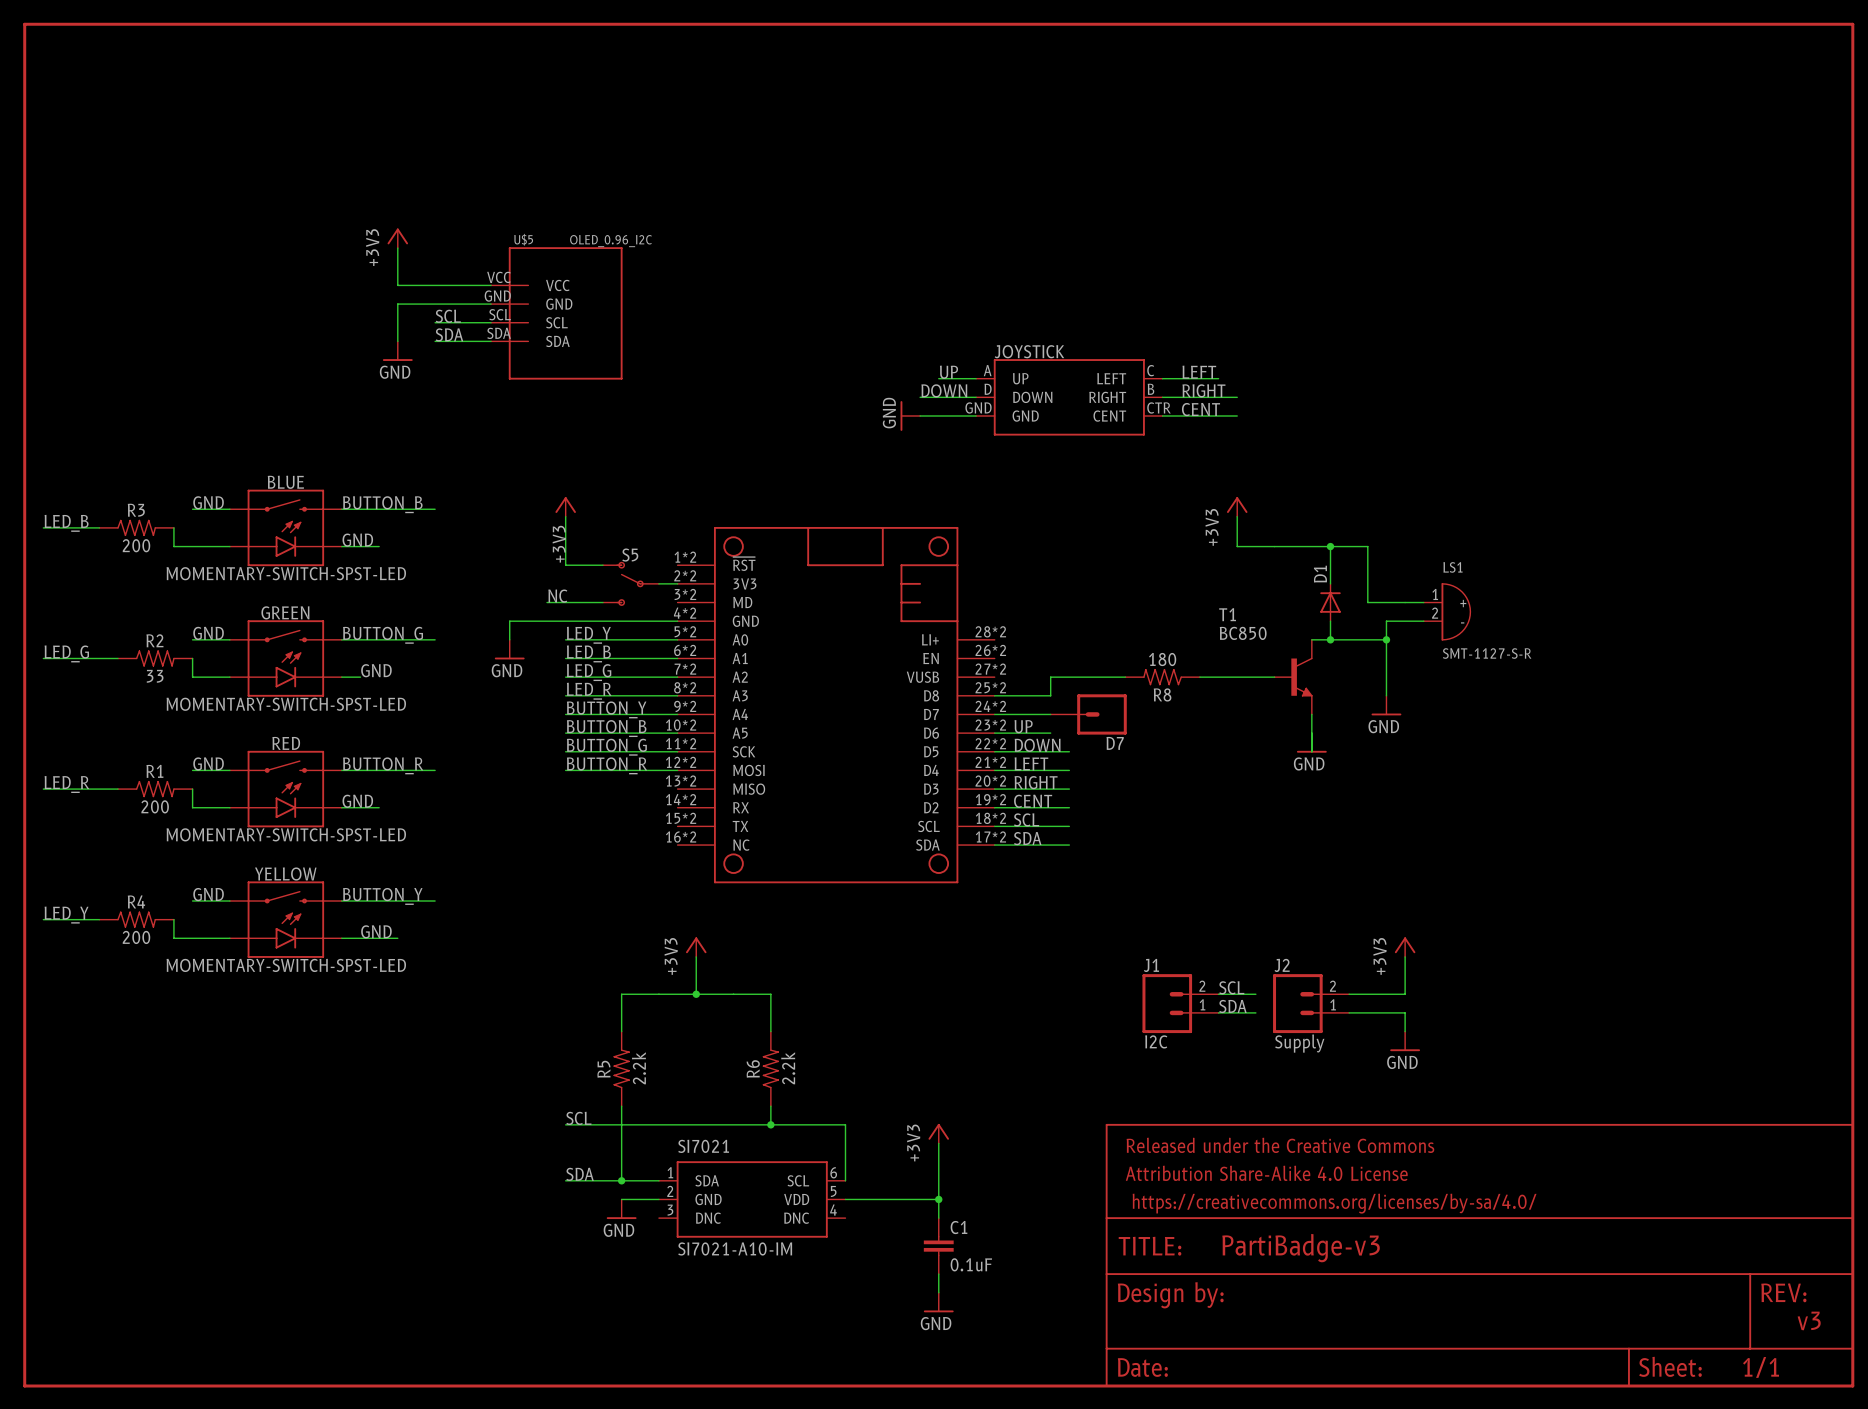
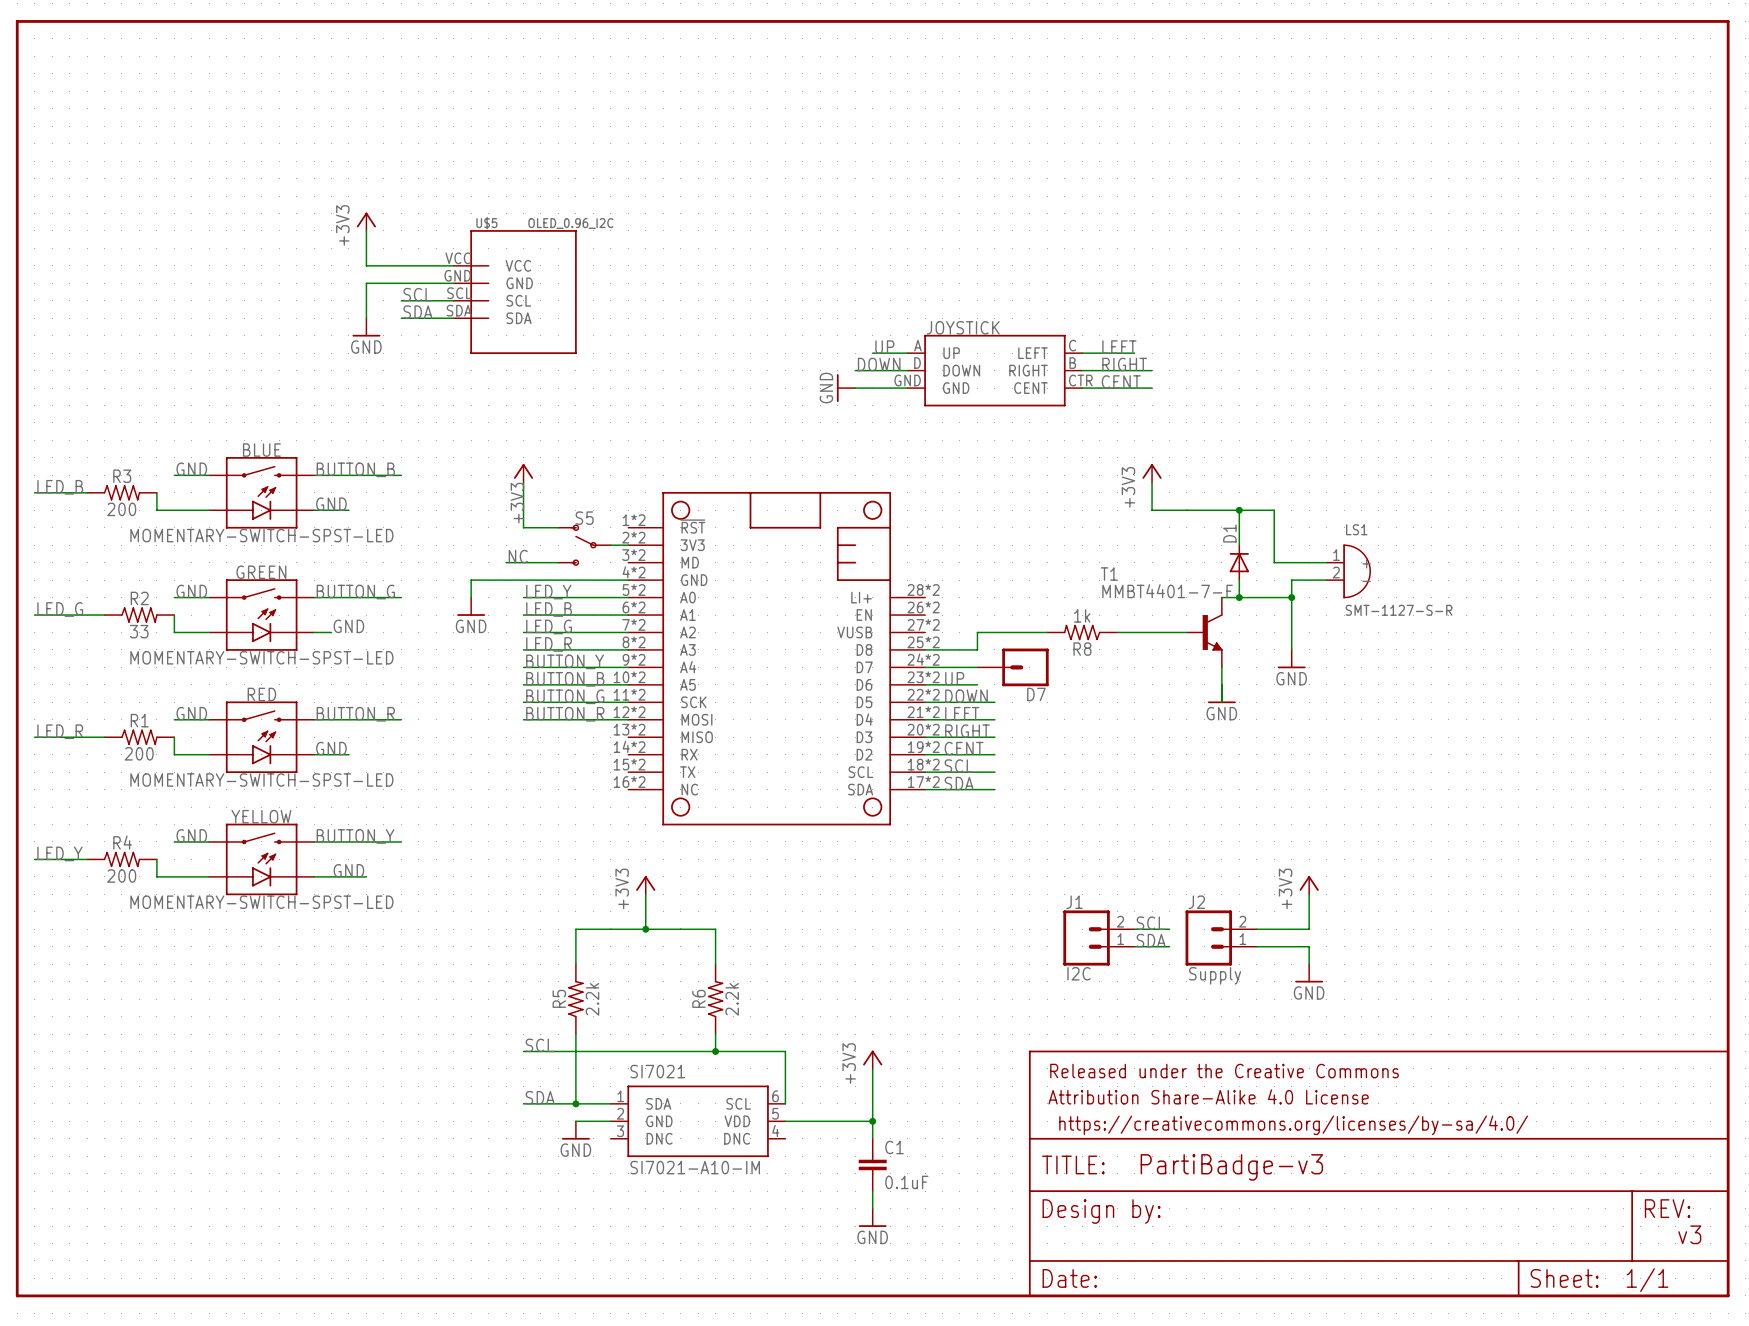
T1 name position: T1 (1227, 614) -> T1 (1109, 574)
T1 value: BC850 (1243, 633) -> MMBT4401-7-F (1167, 591)
R8 value: 180 (1162, 659) -> 1k (1082, 615)

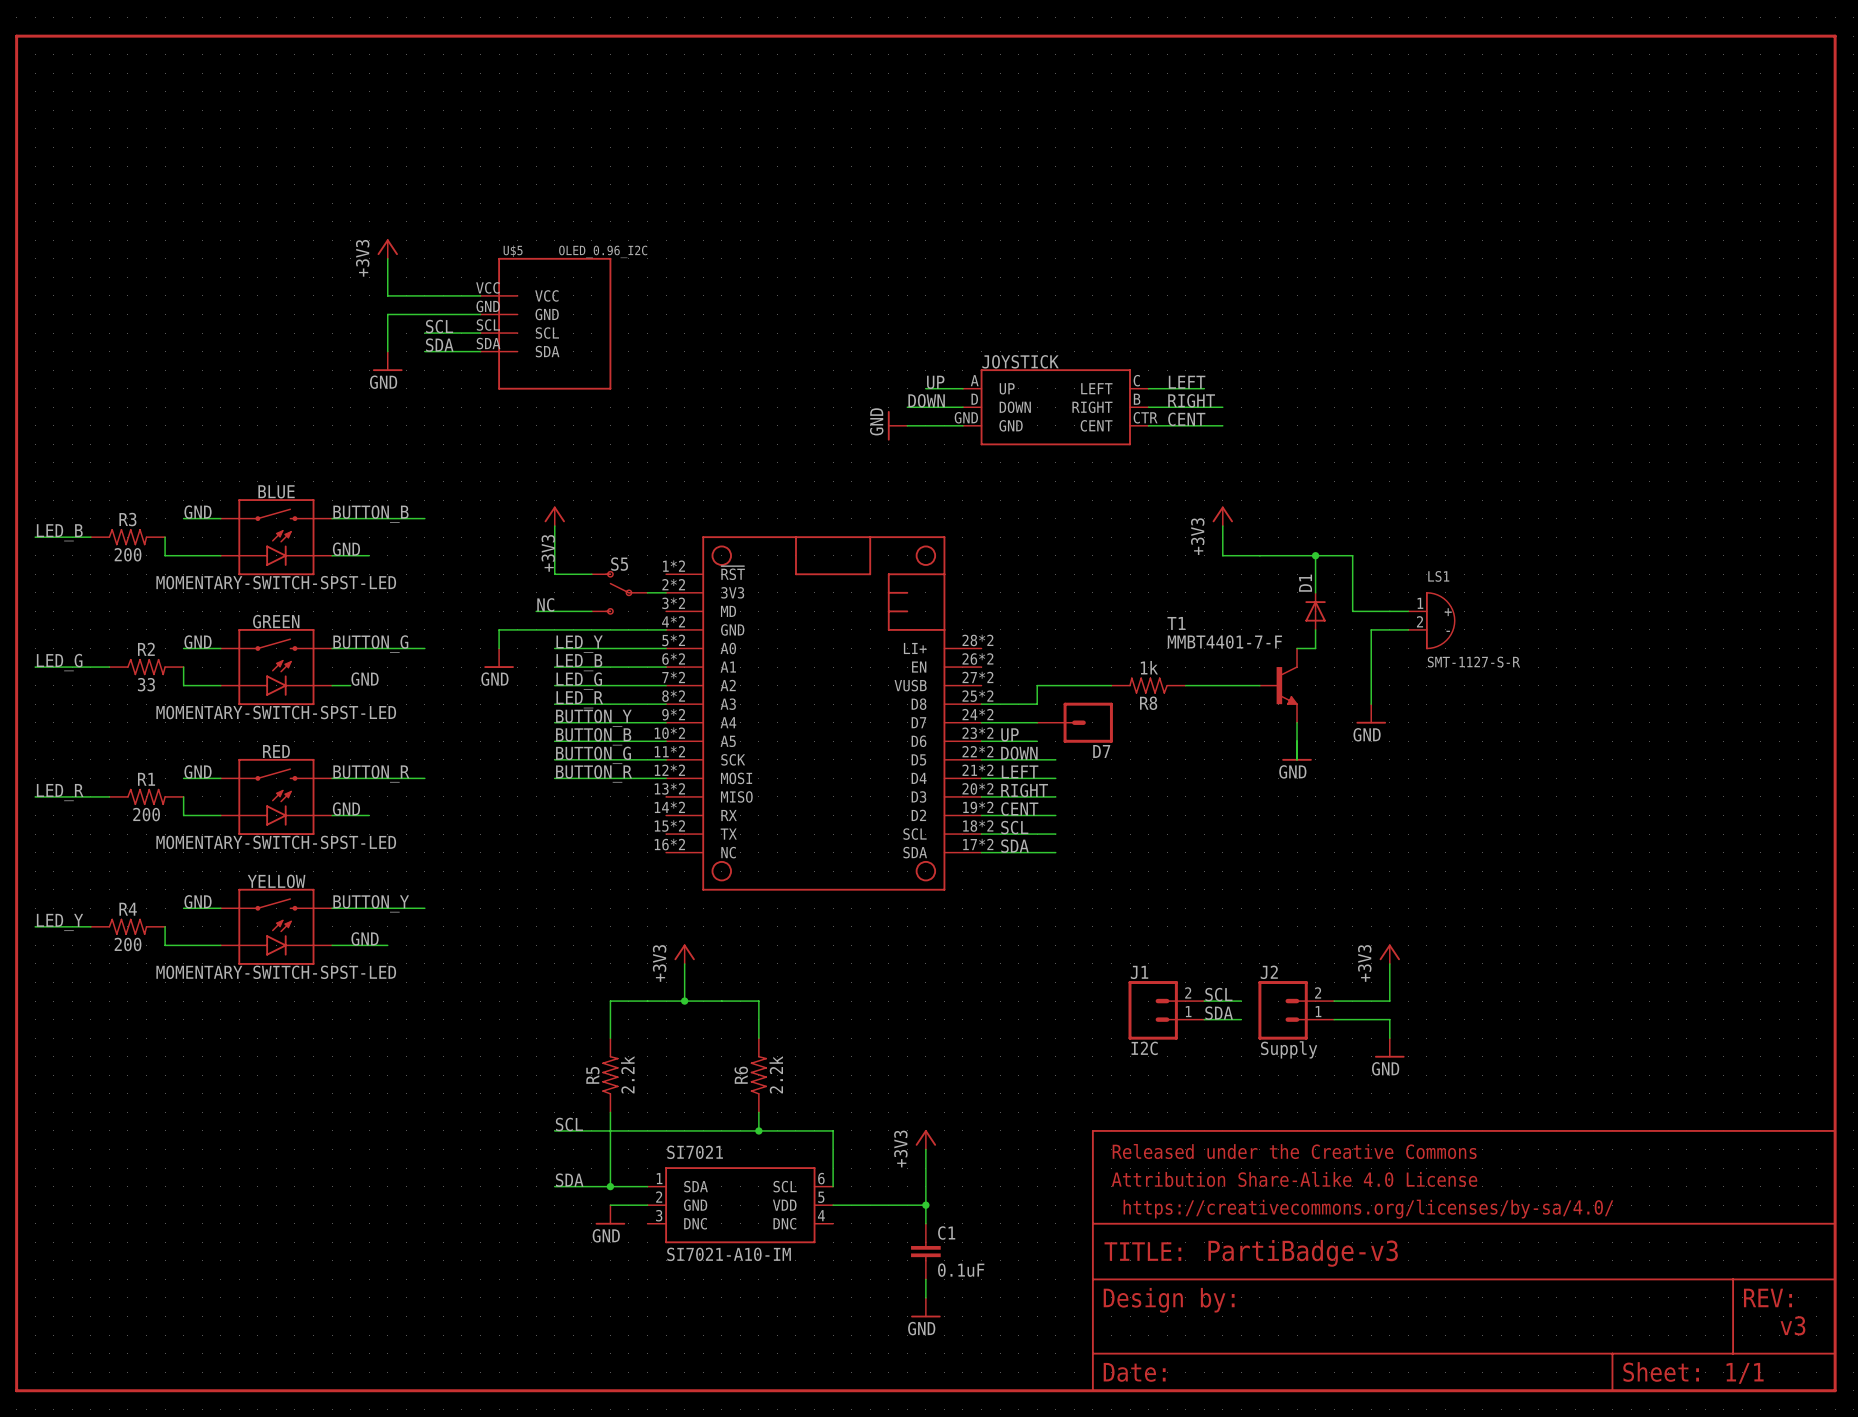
wire: (1239, 597) (1291, 597) -> none
junction: (1239, 597) -> none
junction: (1291, 597) -> none

